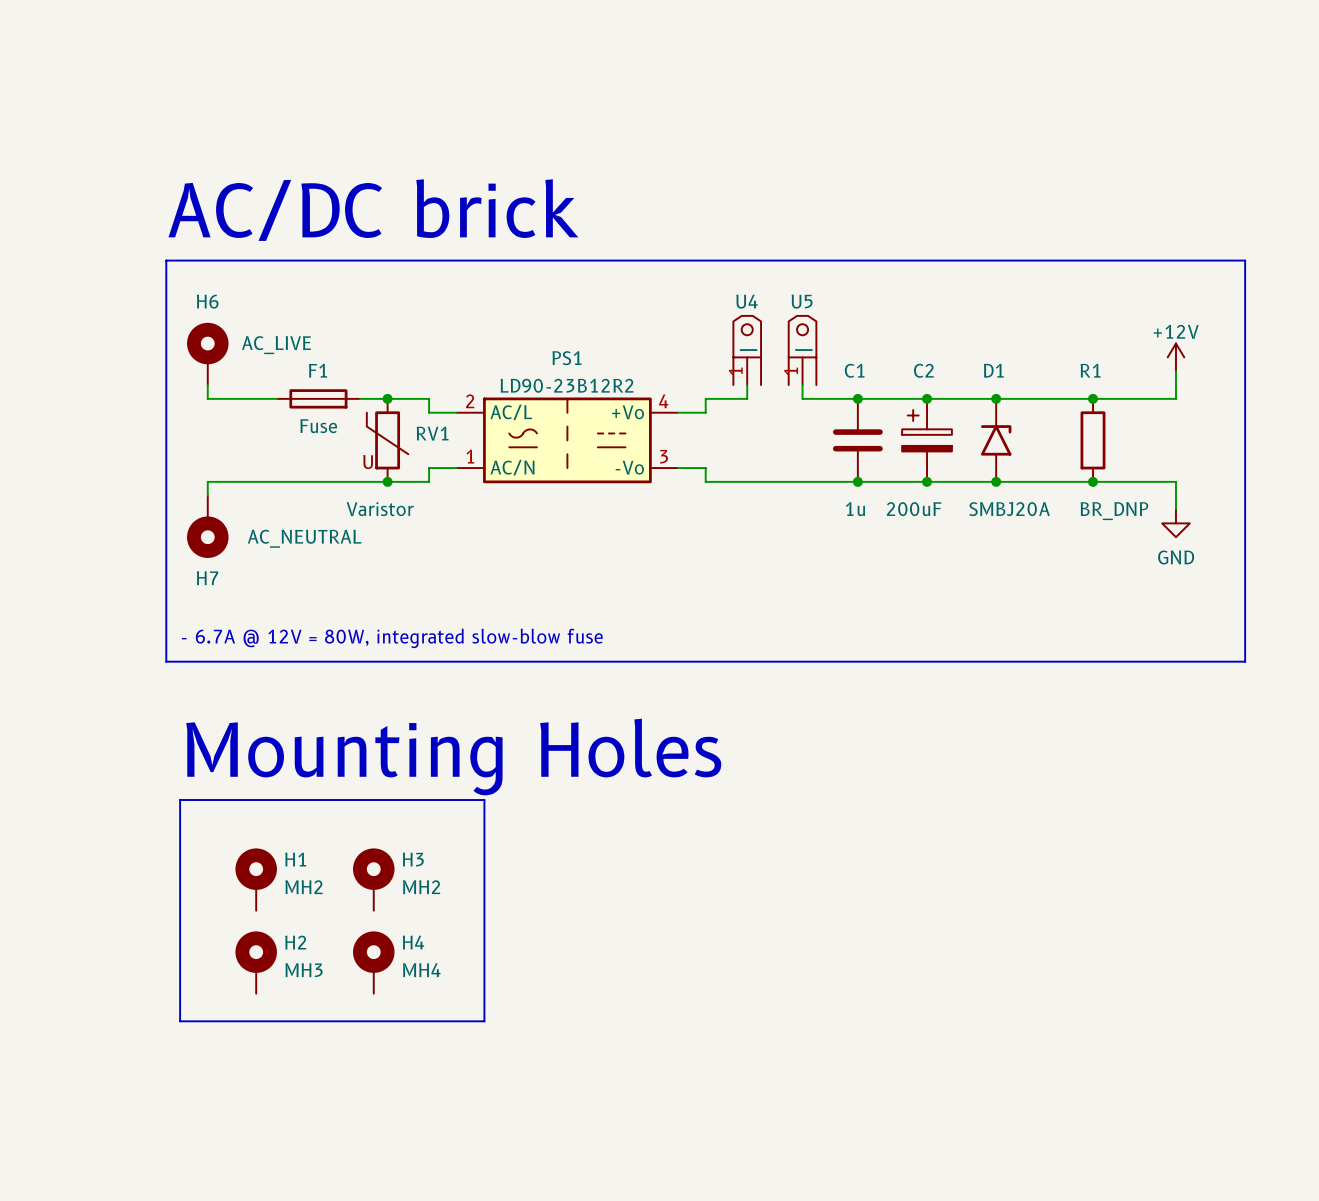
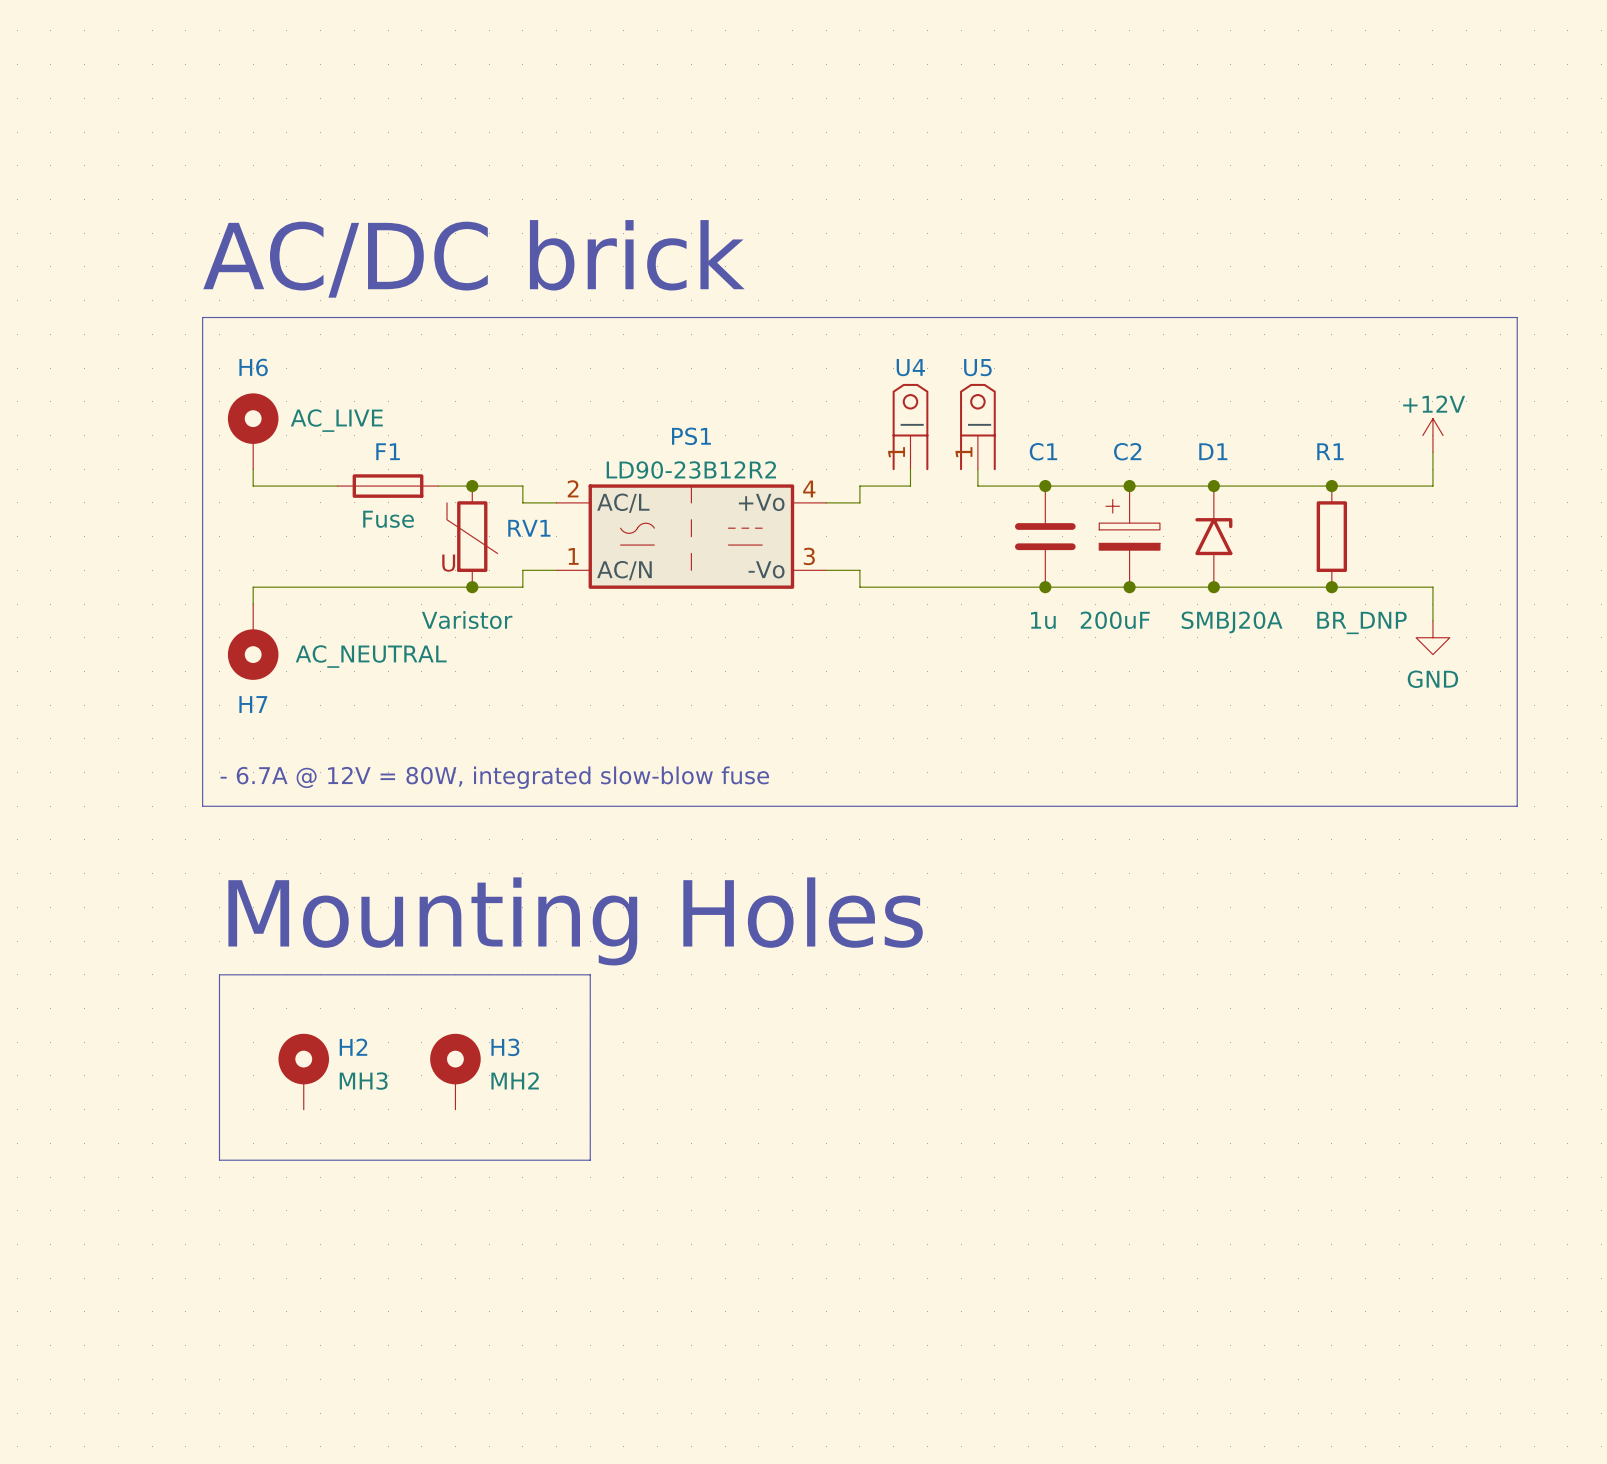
H1: MH2 (256, 879) -> none
line: (180, 952) (180, 1021) (484, 1021) (484, 952) -> (219, 1160) (590, 1160)
H2 position: (256, 962) -> (303, 1071)
H4: MH4 (373, 962) -> none

